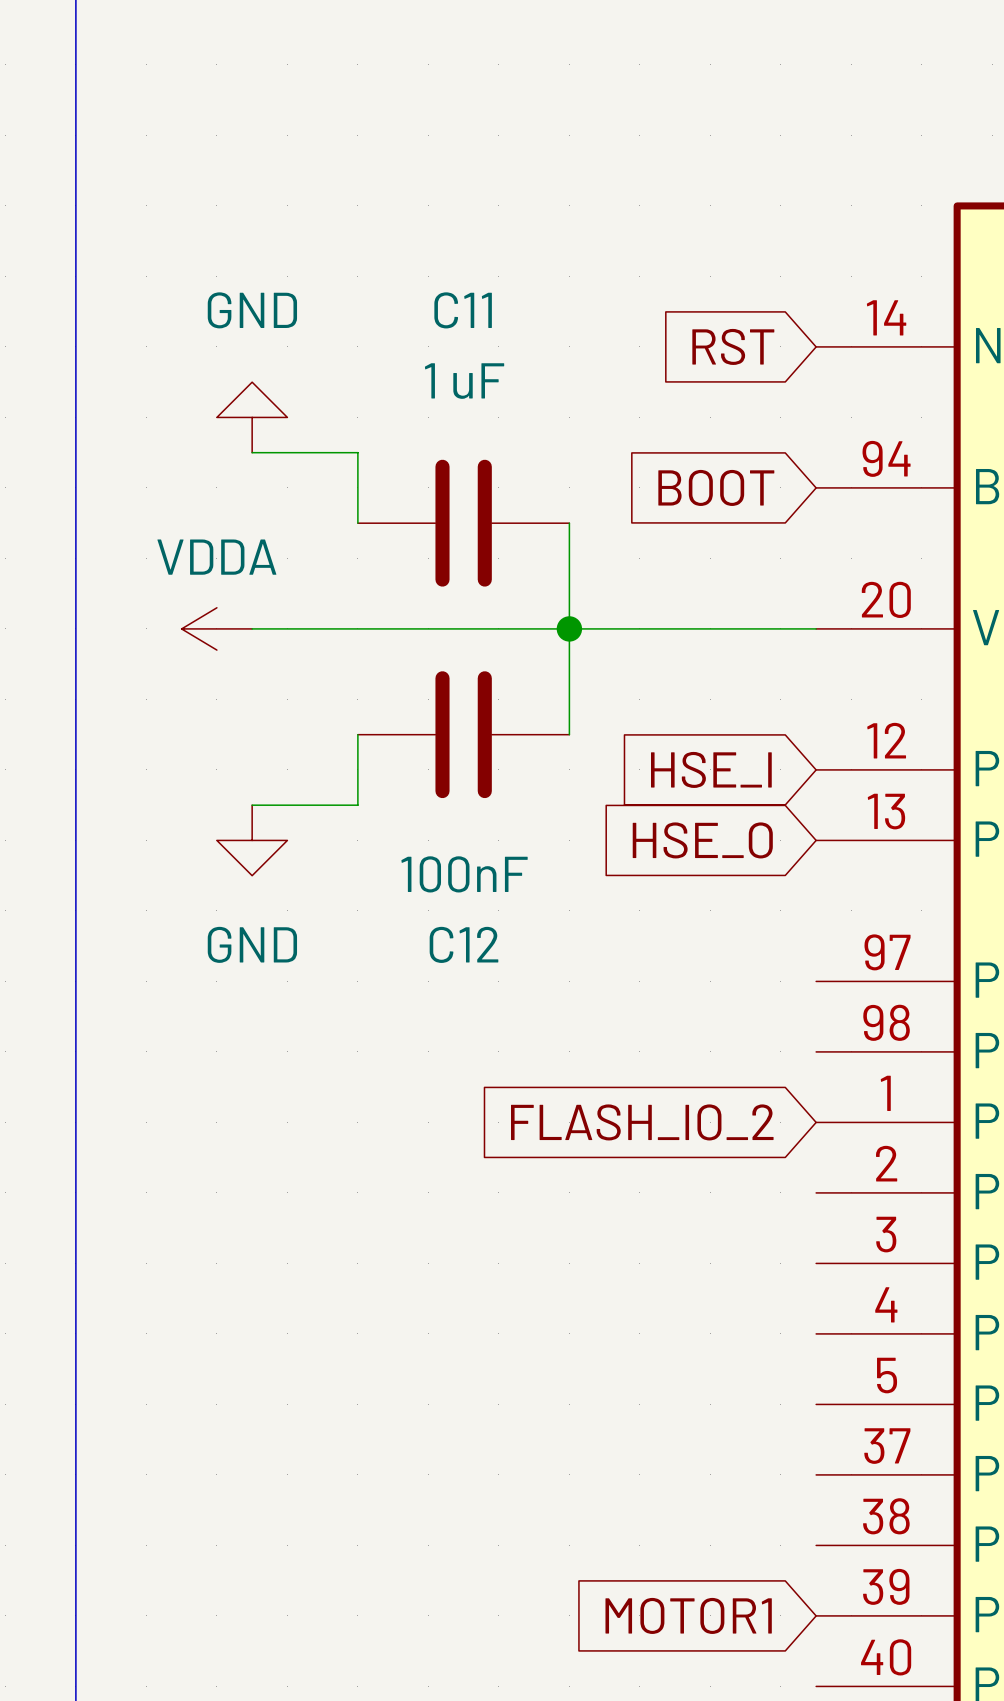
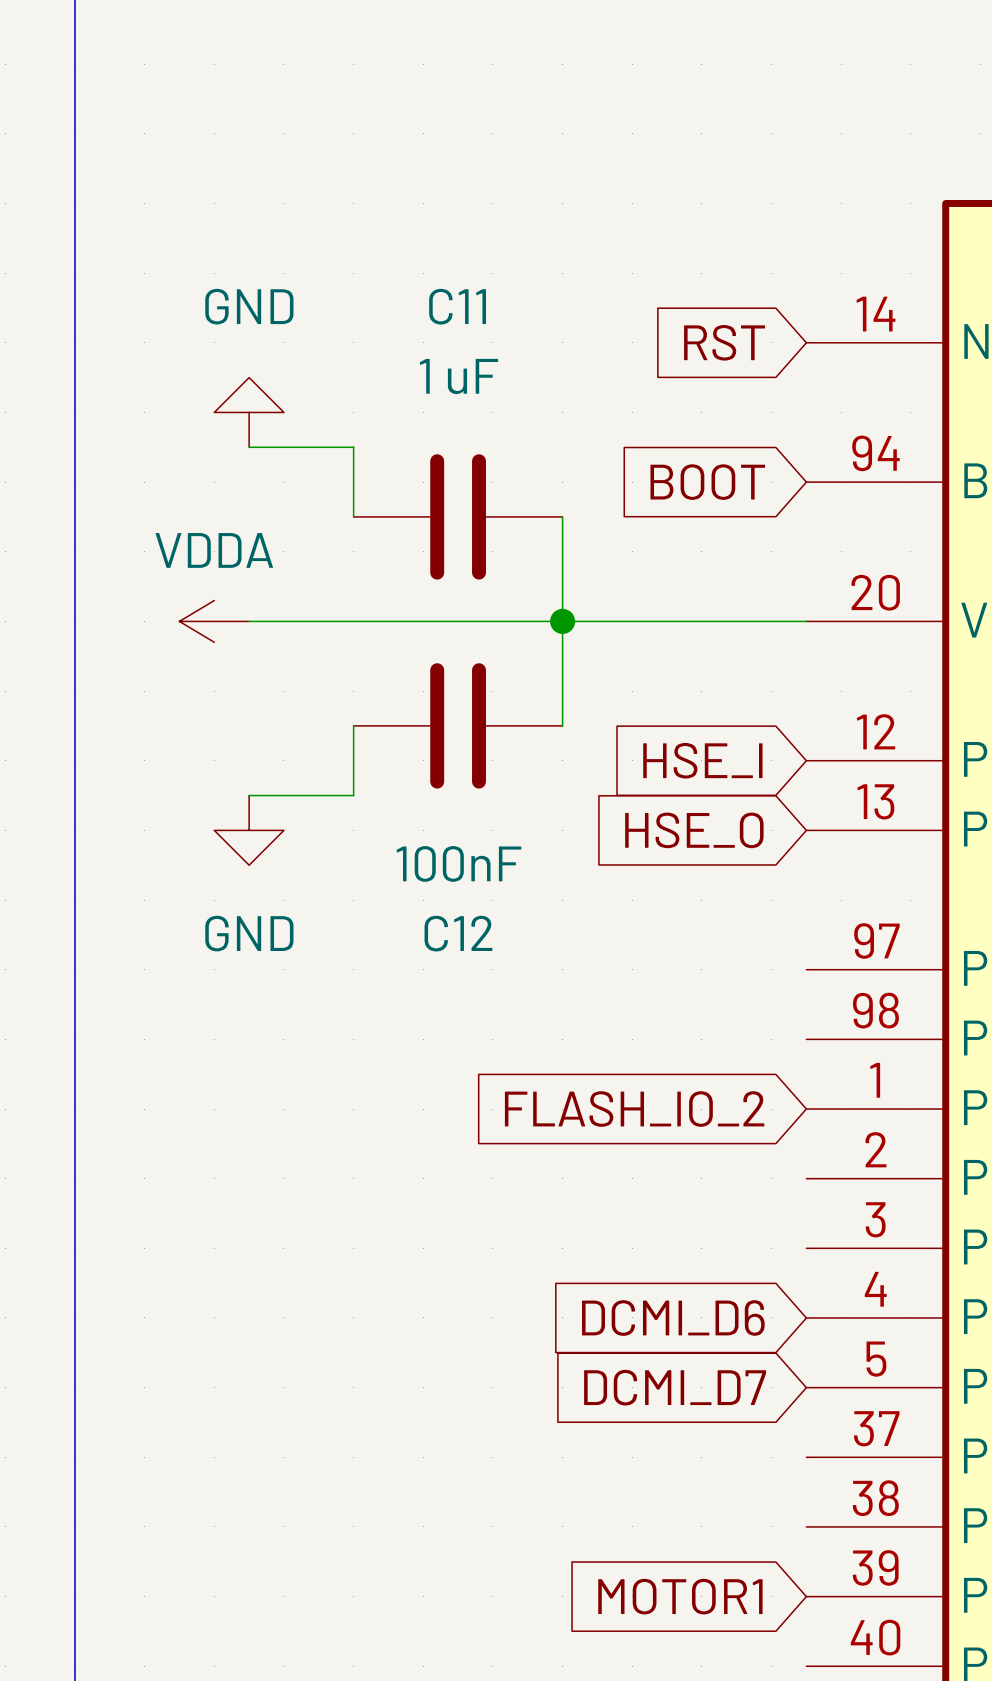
global label: none -> DCMI_D6 (673, 1318)
global label: none -> DCMI_D7 (675, 1387)

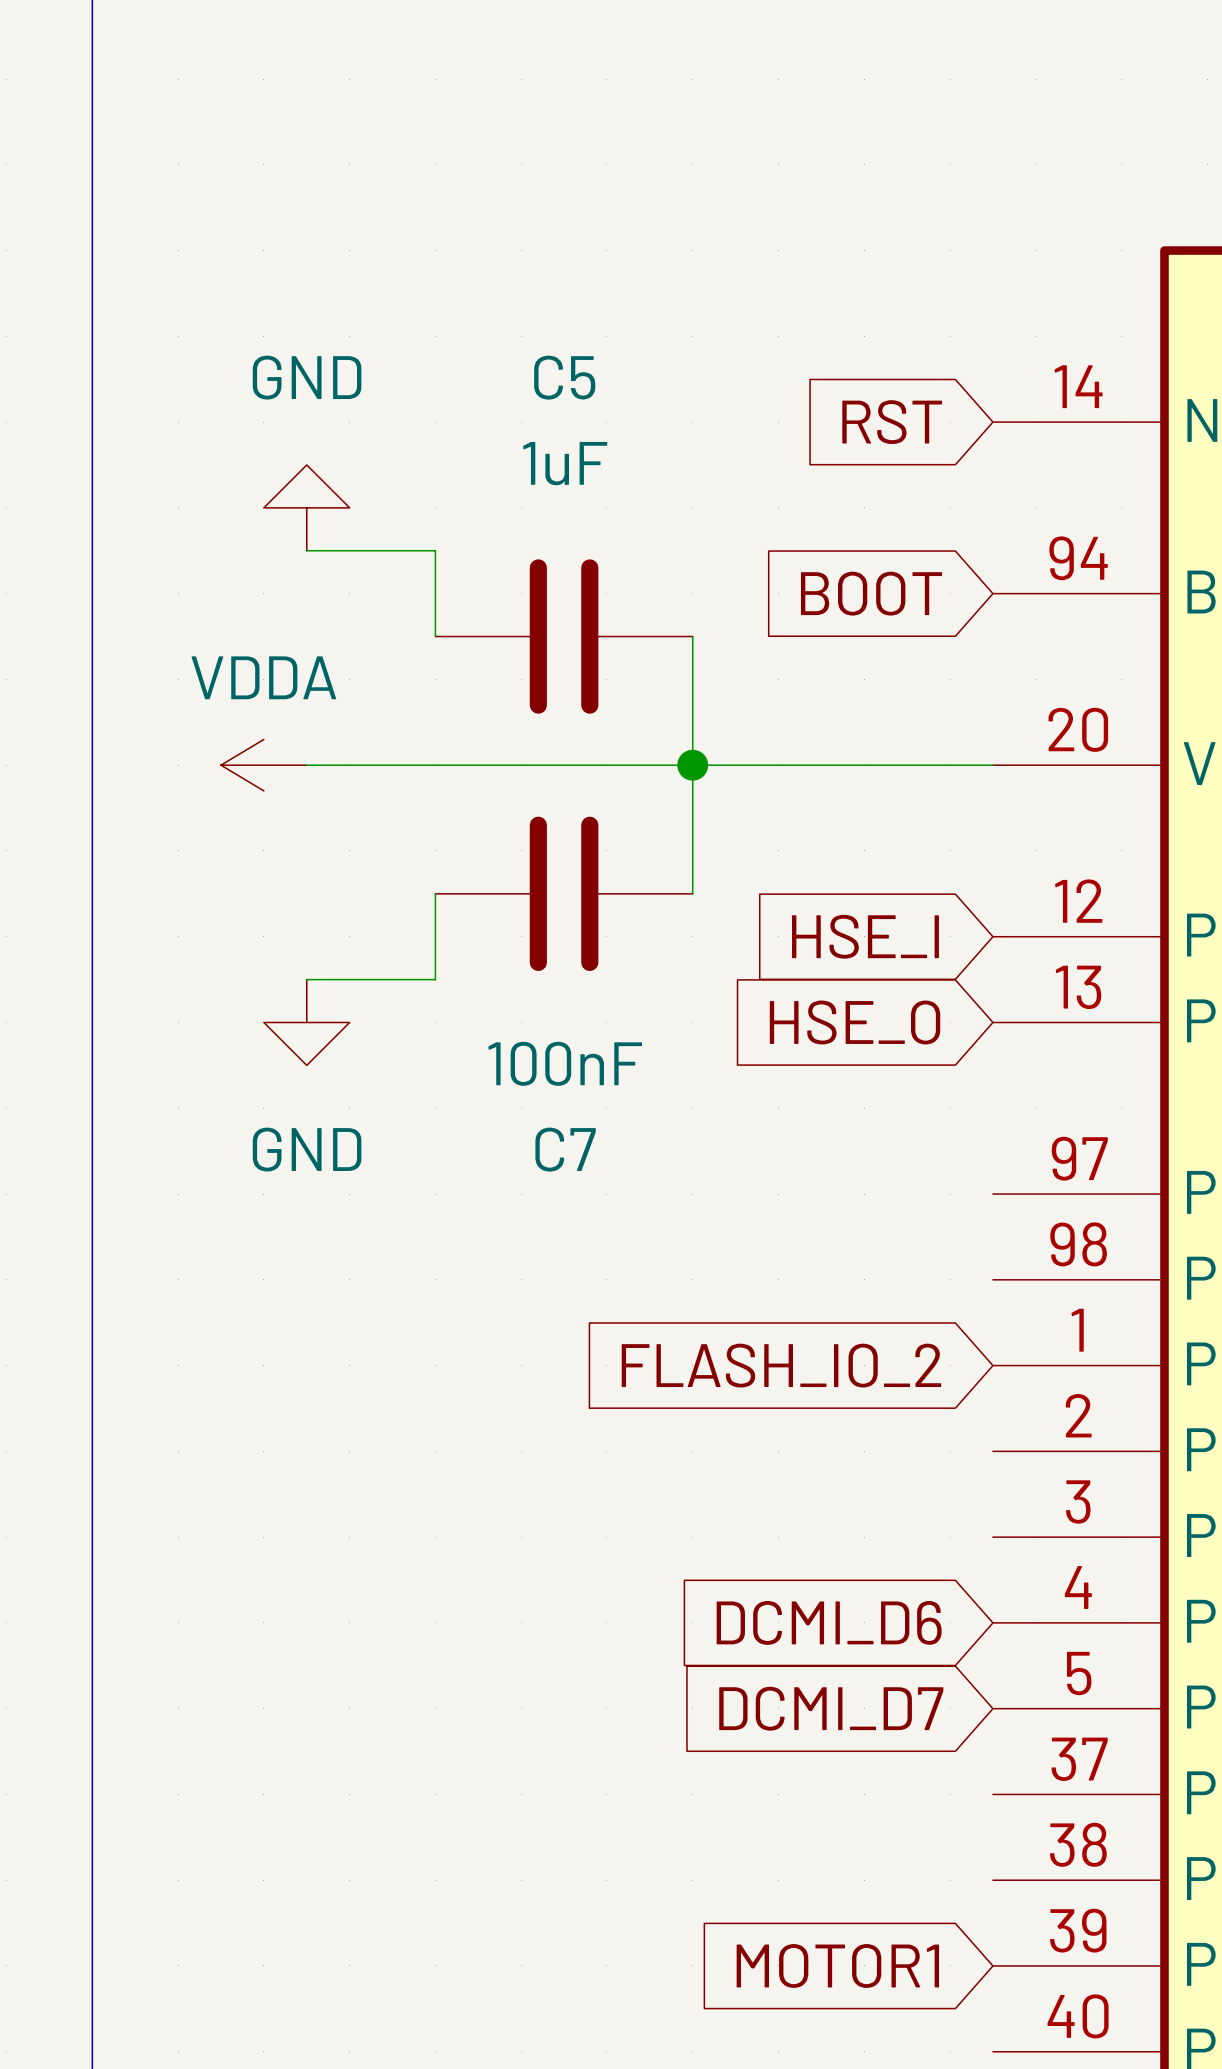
C11 name: C11 (457, 306) -> C5 (564, 377)
C11 value: 1 uF (458, 376) -> 1uF (565, 463)
C12 name: C12 (458, 933) -> C7 (565, 1149)

